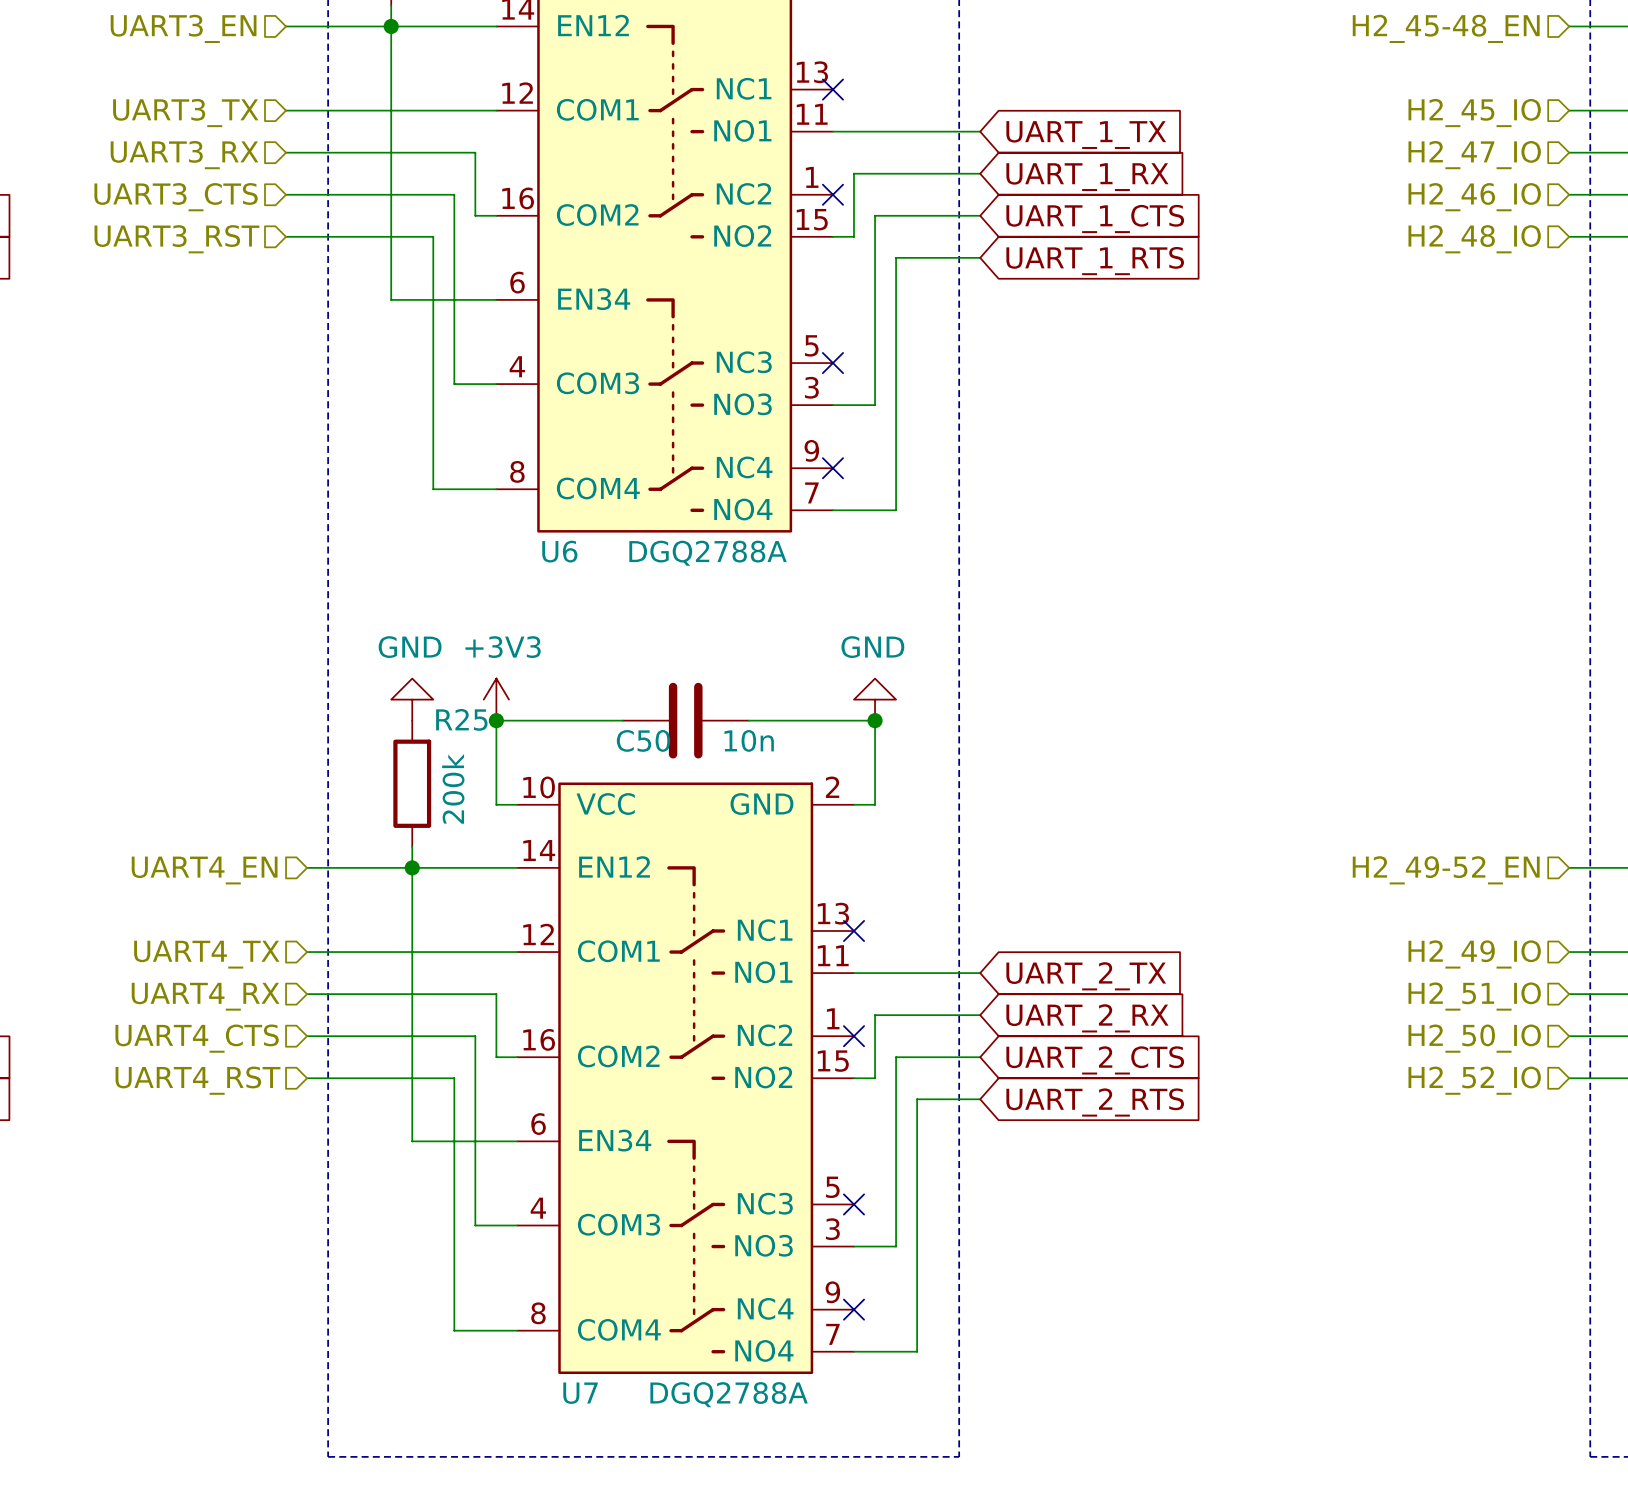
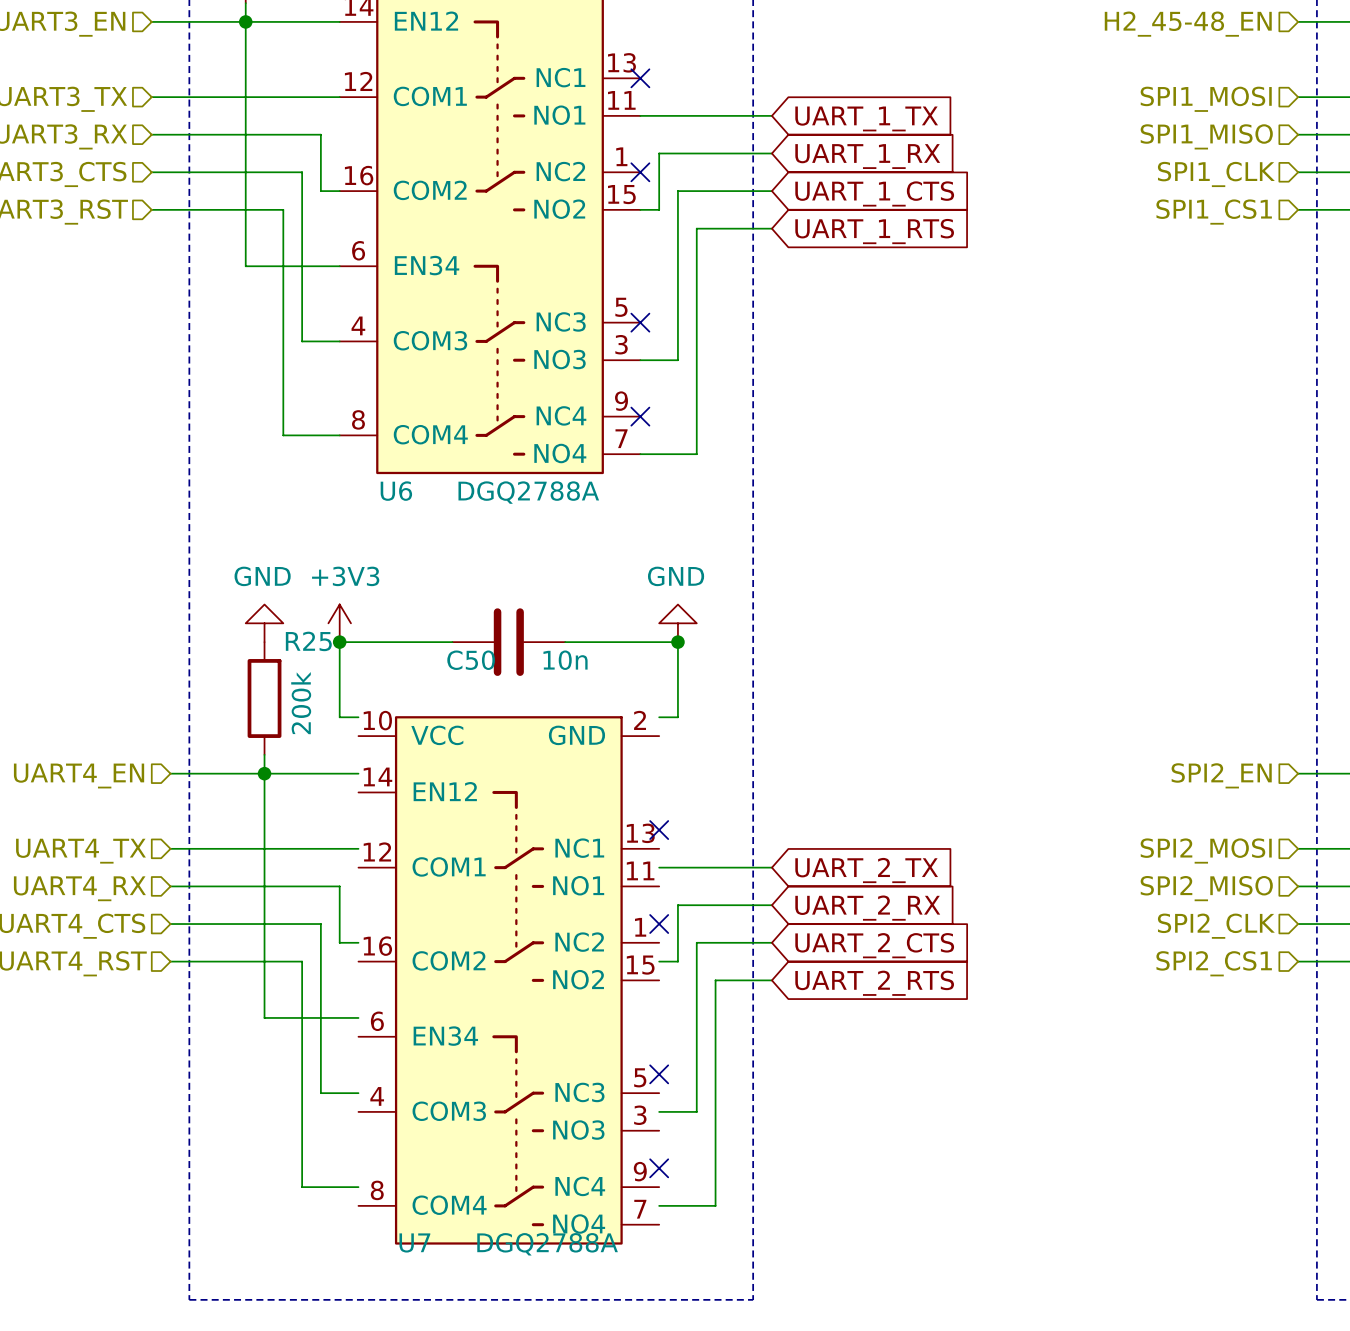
hierarchical label: H2_45_IO (1474, 113) -> SPI1_MOSI (1206, 99)
hierarchical label: H2_47_IO (1474, 155) -> SPI1_MISO (1206, 136)
hierarchical label: H2_46_IO (1474, 197) -> SPI1_CLK (1216, 174)
hierarchical label: H2_48_IO (1474, 239) -> SPI1_CS1 (1214, 212)
hierarchical label: H2_49-52_EN (1446, 870) -> SPI2_EN (1221, 775)
hierarchical label: H2_49_IO (1474, 954) -> SPI2_MOSI (1206, 851)
hierarchical label: H2_51_IO (1474, 996) -> SPI2_MISO (1206, 888)
hierarchical label: H2_50_IO (1474, 1038) -> SPI2_CLK (1216, 926)
U7 position: (685, 1078) -> (508, 980)
hierarchical label: H2_52_IO (1474, 1080) -> SPI2_CS1 (1214, 963)

